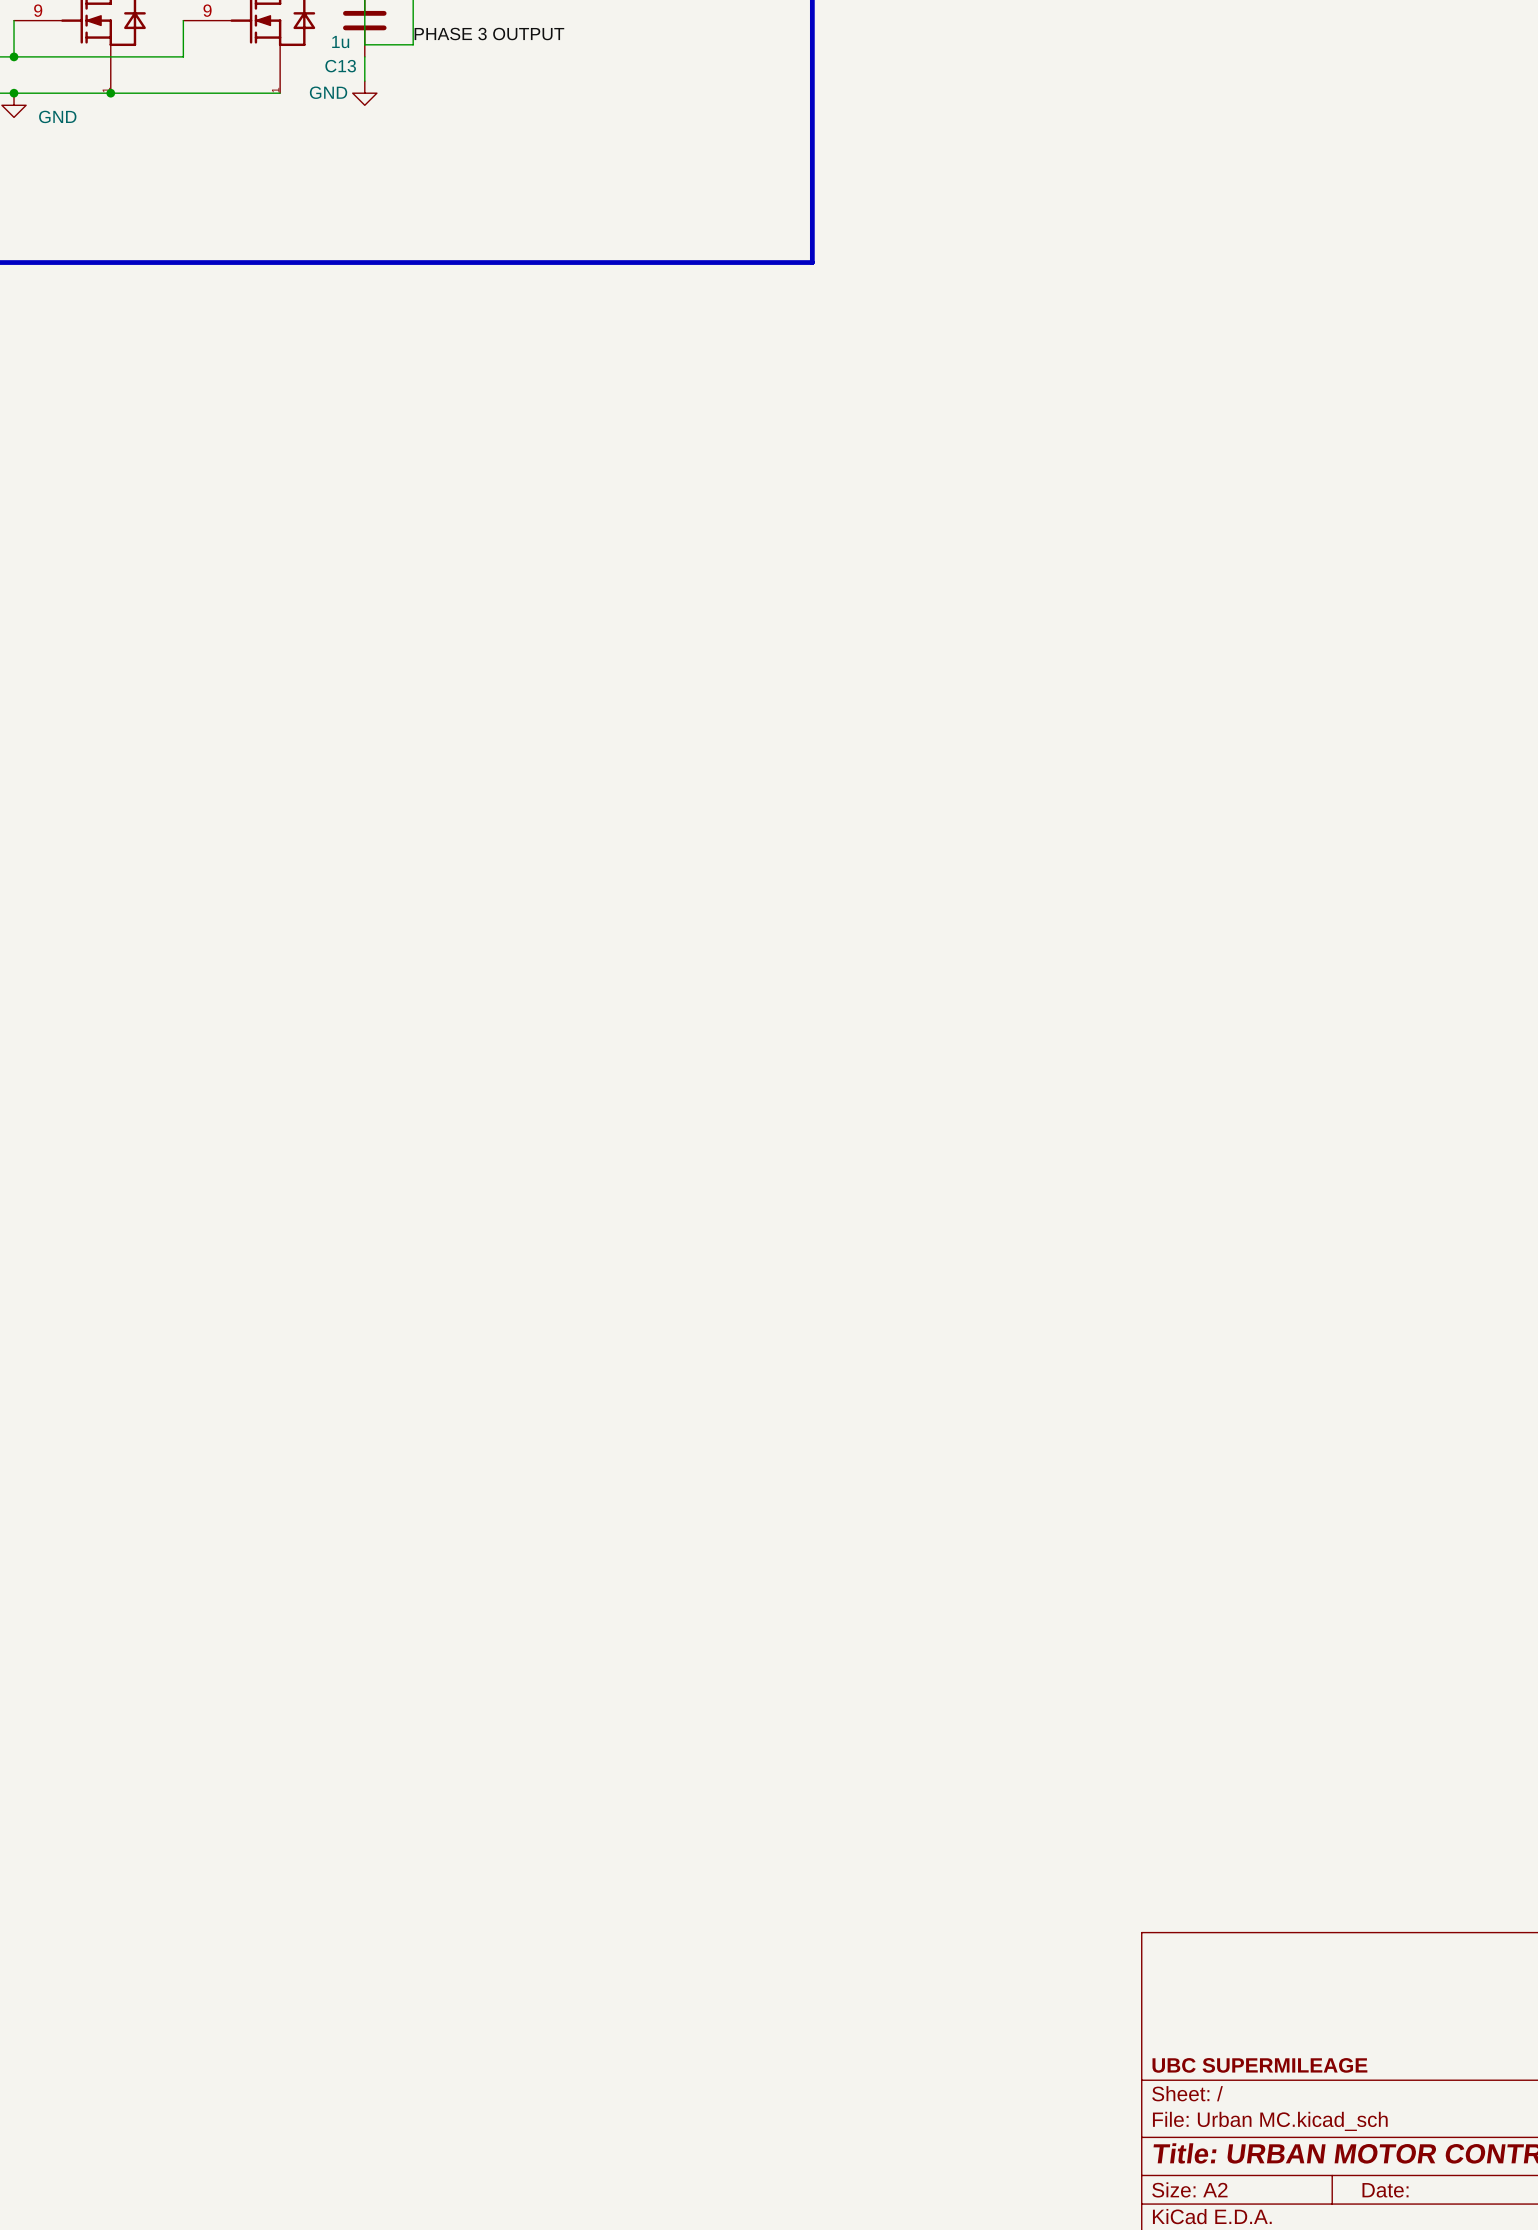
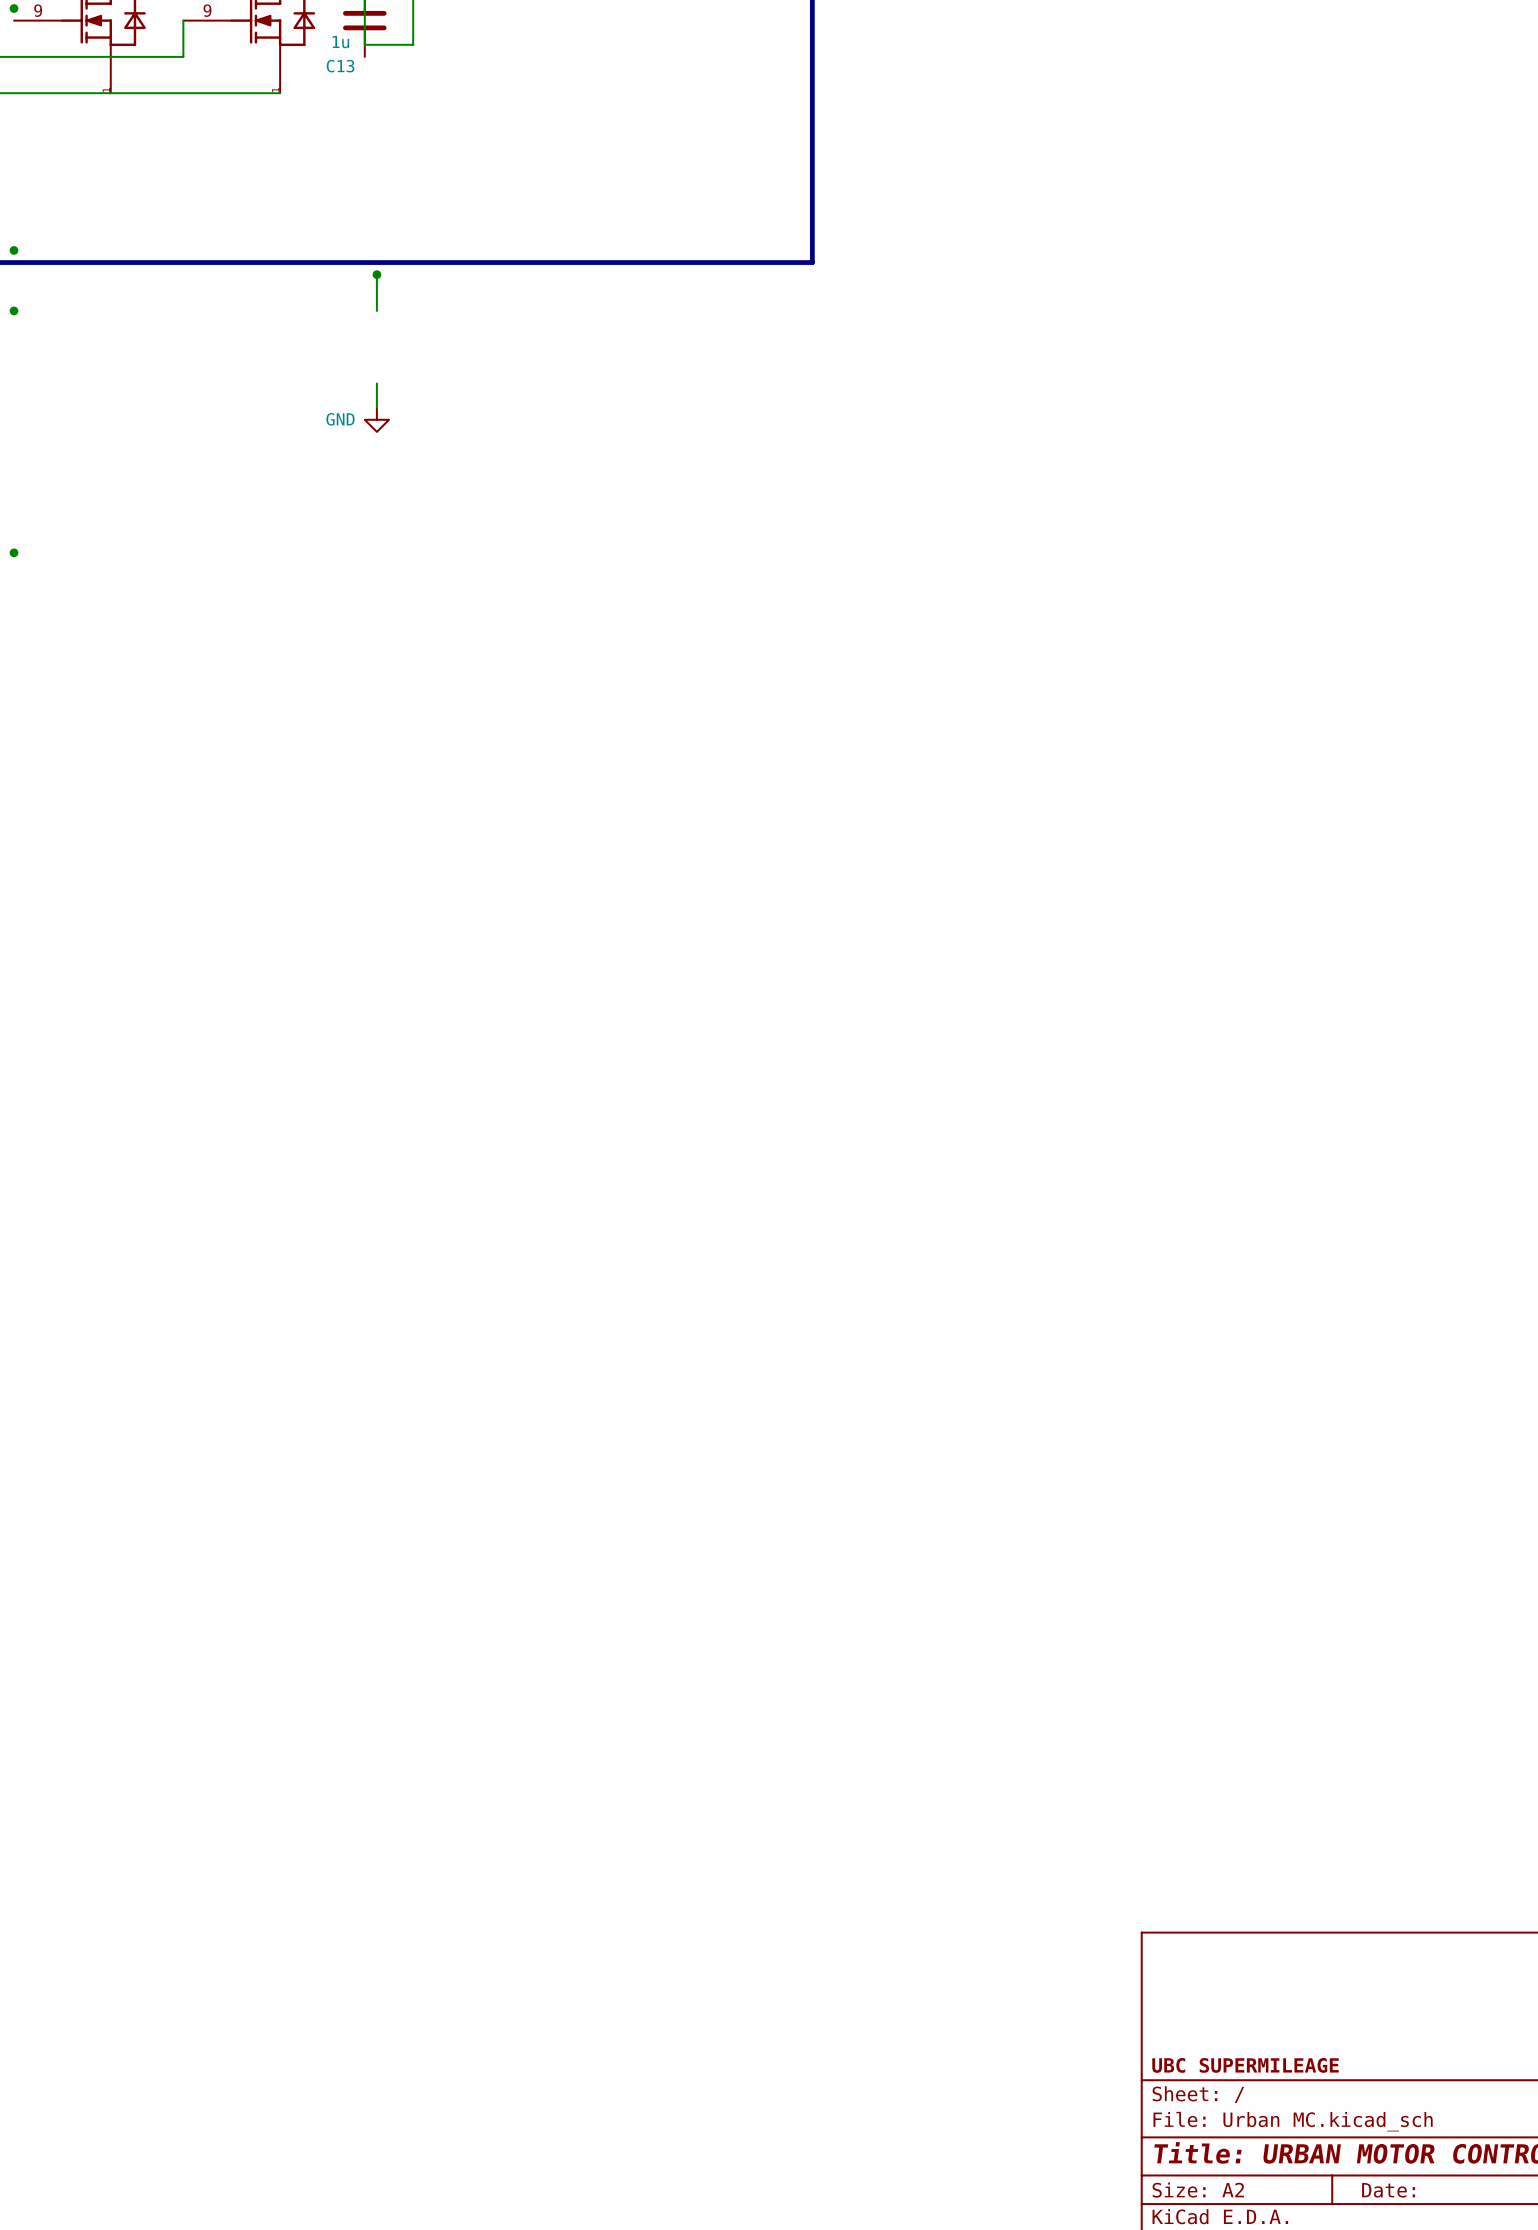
junction: none -> (14, 8)
wire: (14, 20) (14, 56) -> none
label: PHASE 3 OUTPUT (489, 34) -> none
junction: (14, 56) -> none
wire: (364, 56) (364, 81) -> none
junction: (14, 93) -> none
junction: (110, 93) -> none
power symbol: GND (364, 93) -> none
power symbol: GND (14, 105) -> none
junction: none -> (14, 250)
wire: none -> (376, 274) (376, 310)
junction: none -> (376, 274)
junction: none -> (14, 310)
wire: none -> (376, 383) (376, 407)
power symbol: none -> GND (376, 419)
junction: none -> (14, 552)

